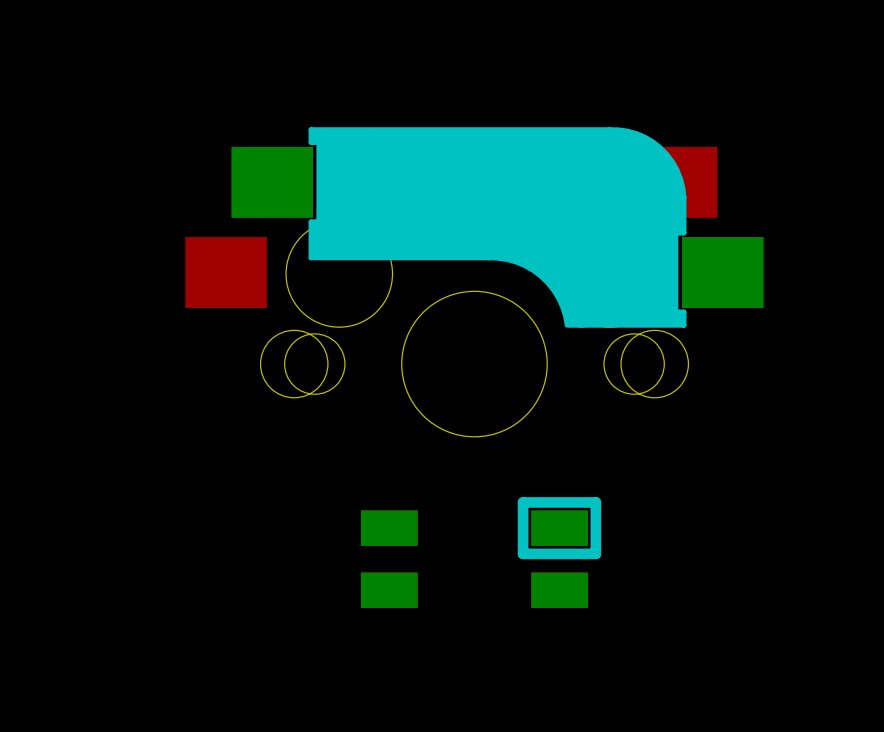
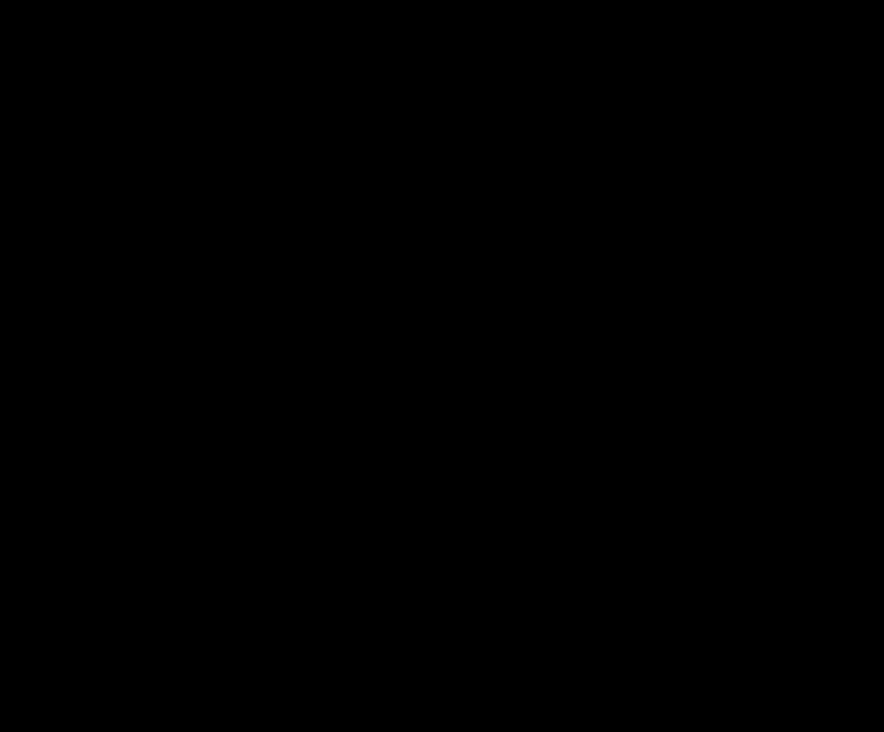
part: (474, 367) -> none

